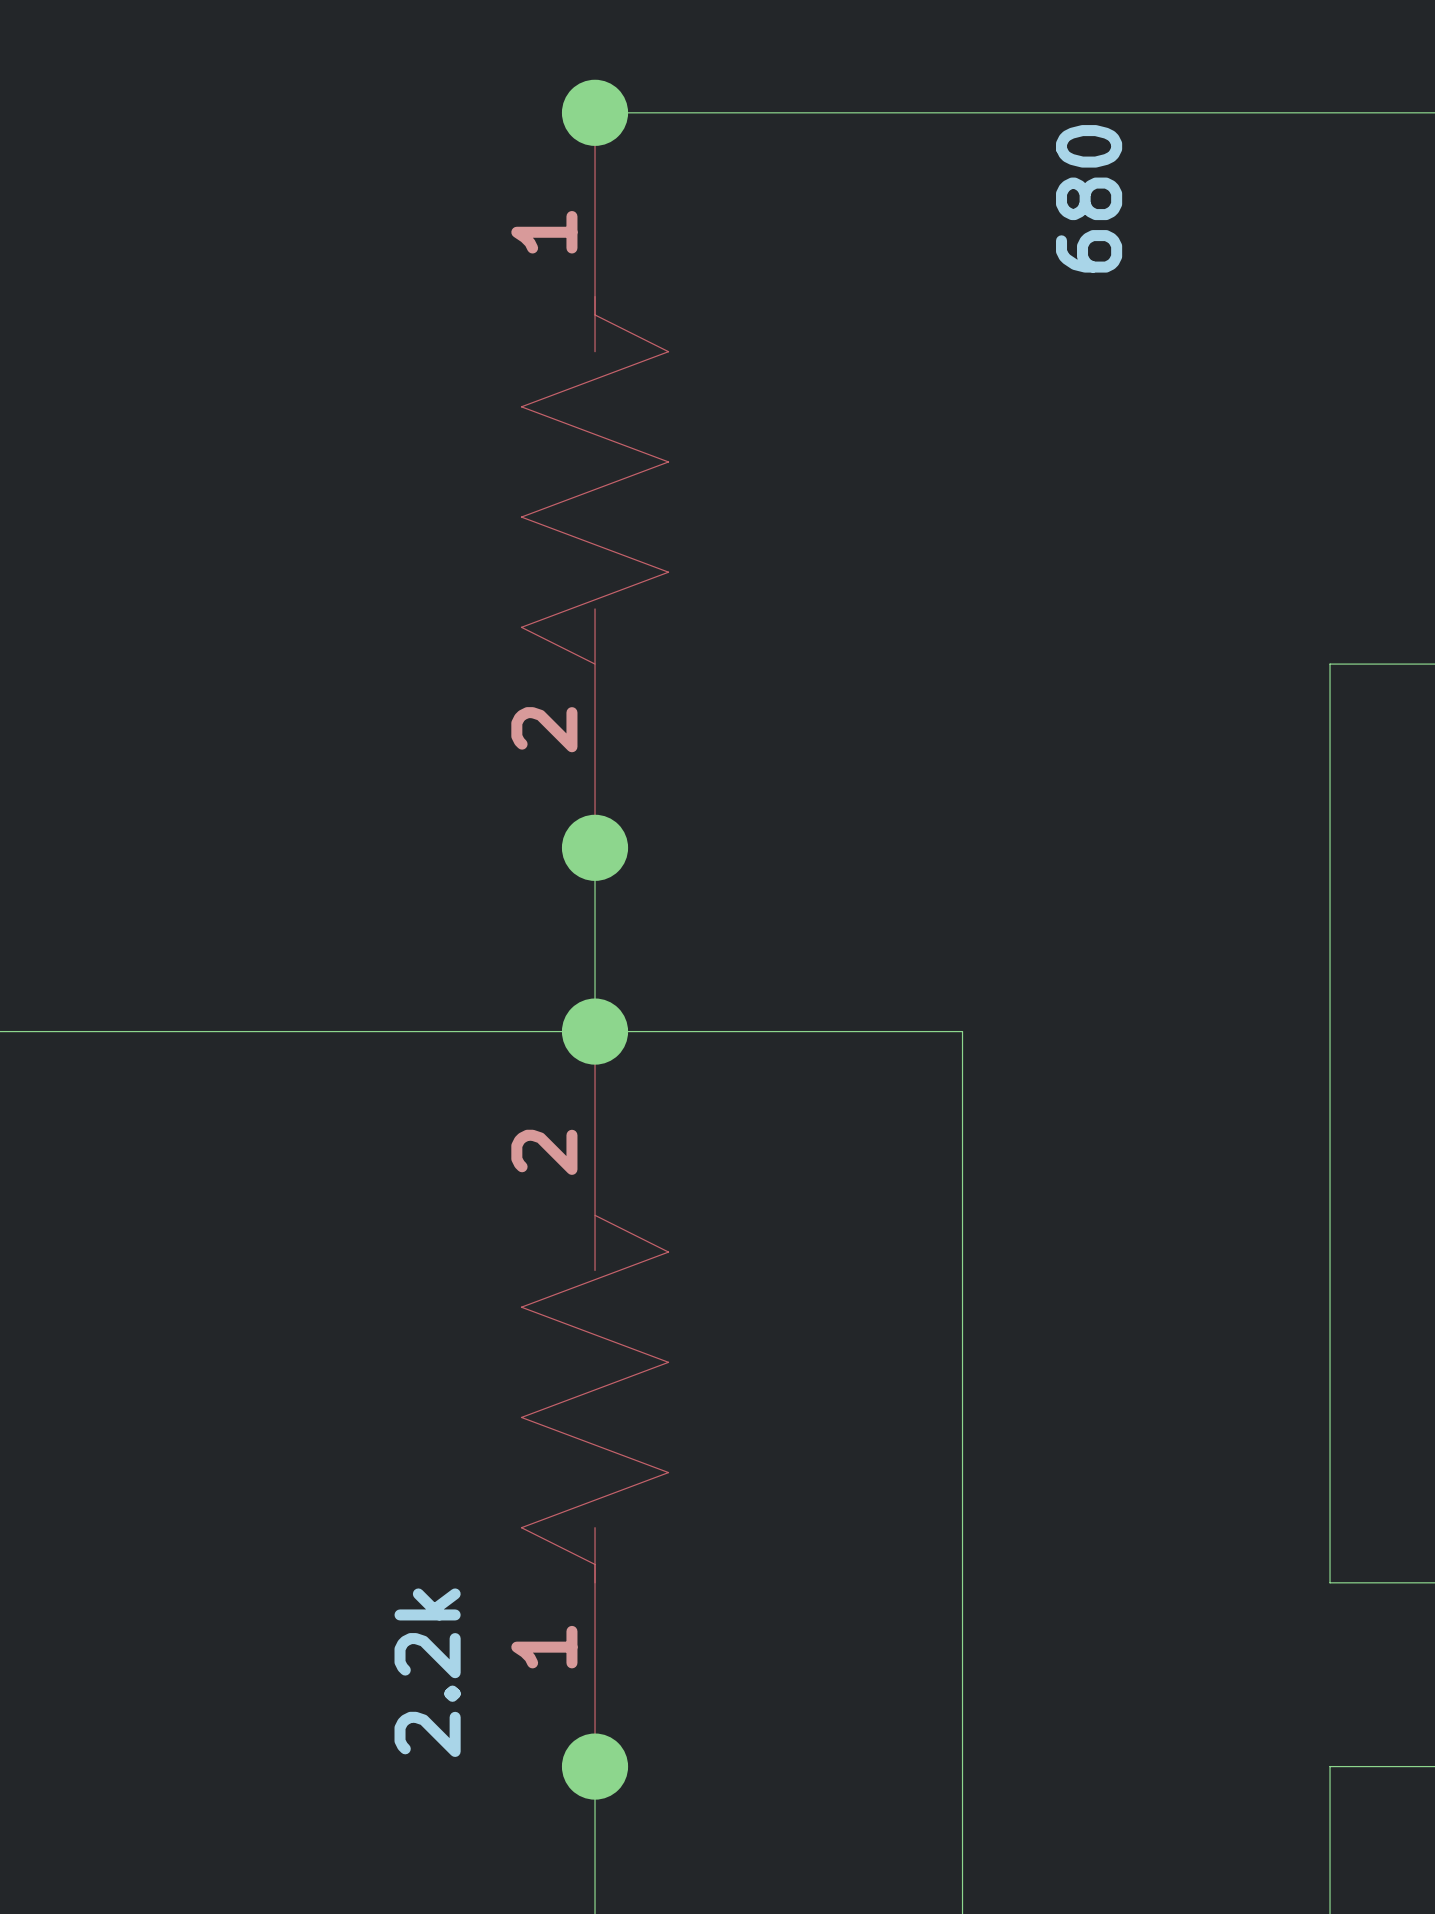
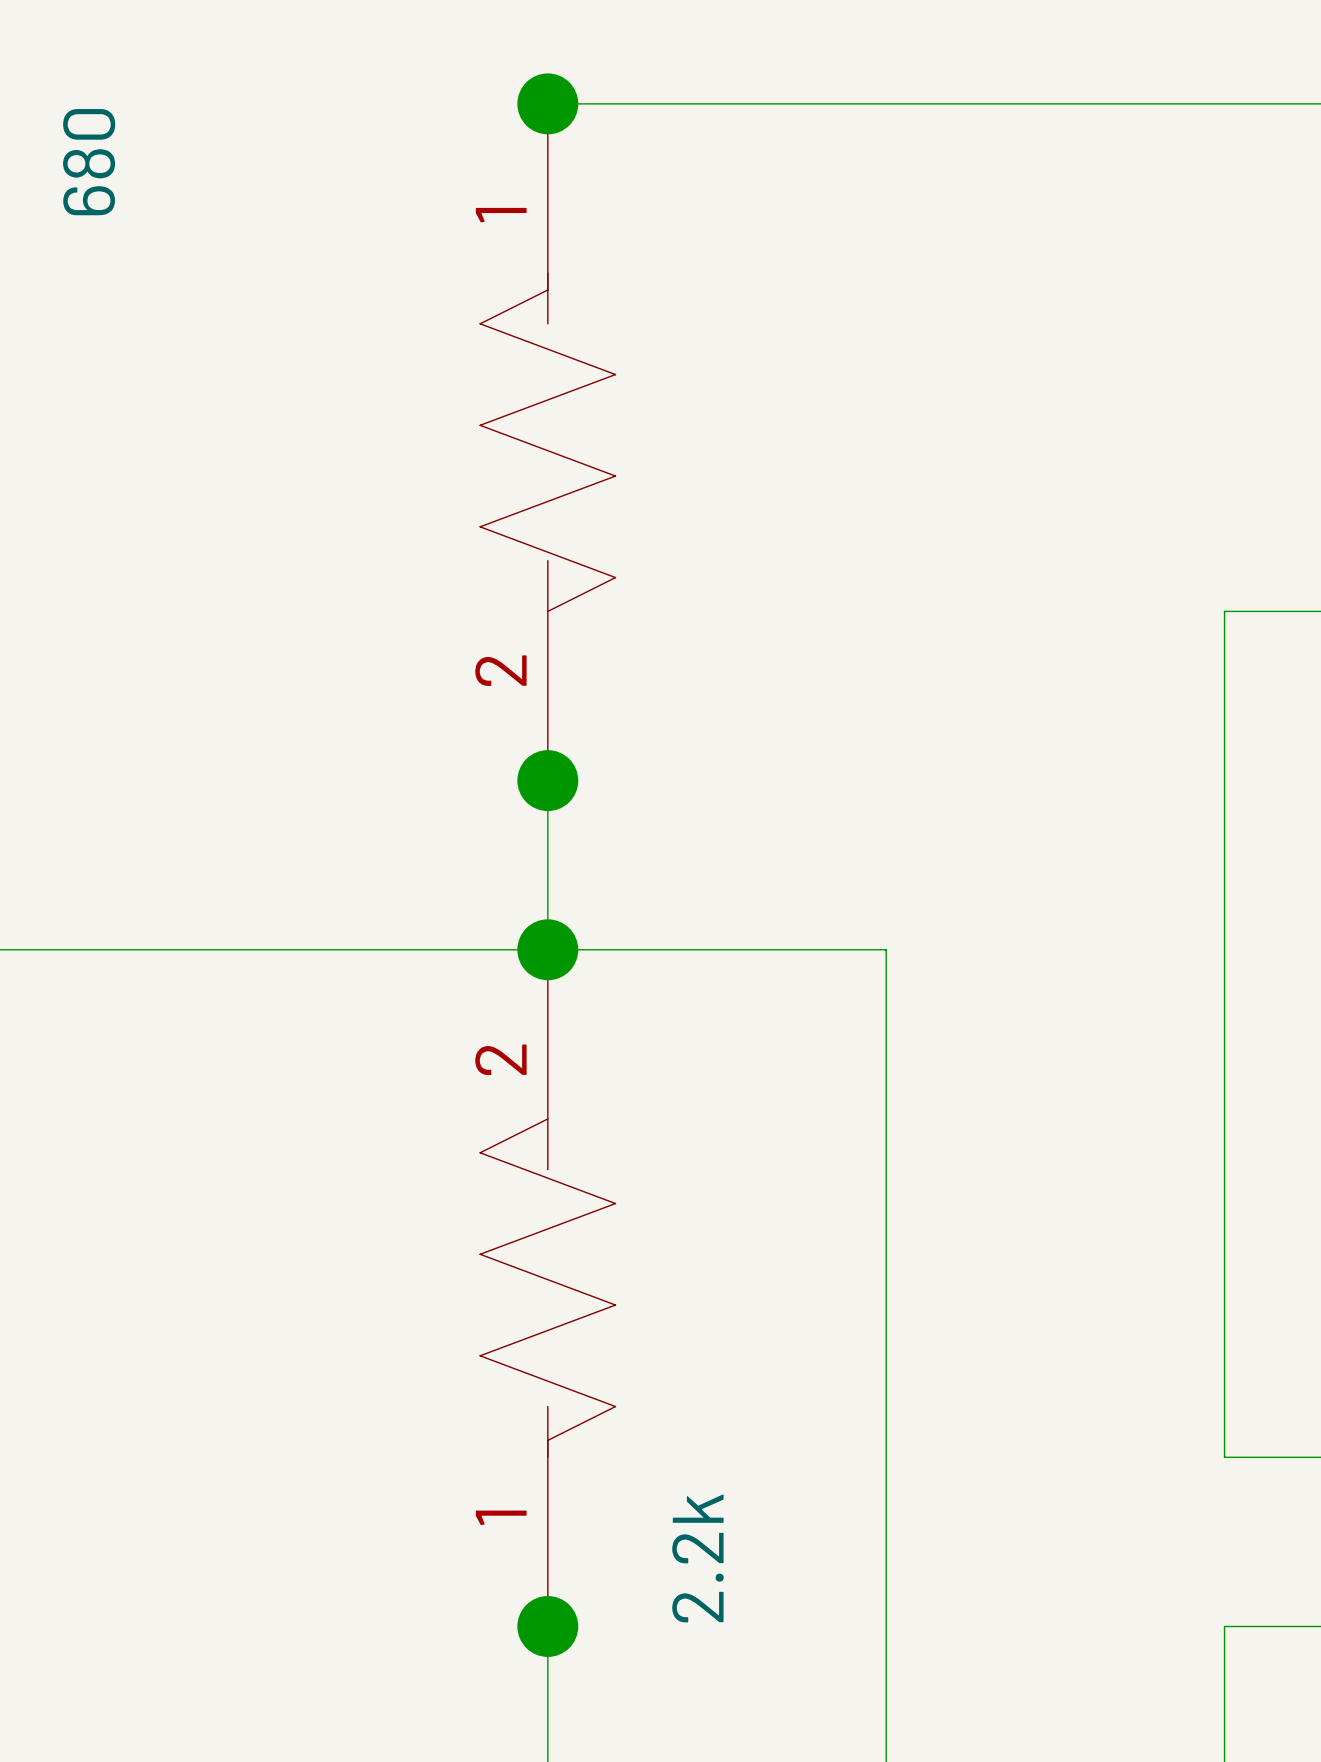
part flip: as is (595, 480) -> left-right (547, 442)
part flip: as is (595, 1399) -> left-right (547, 1288)

